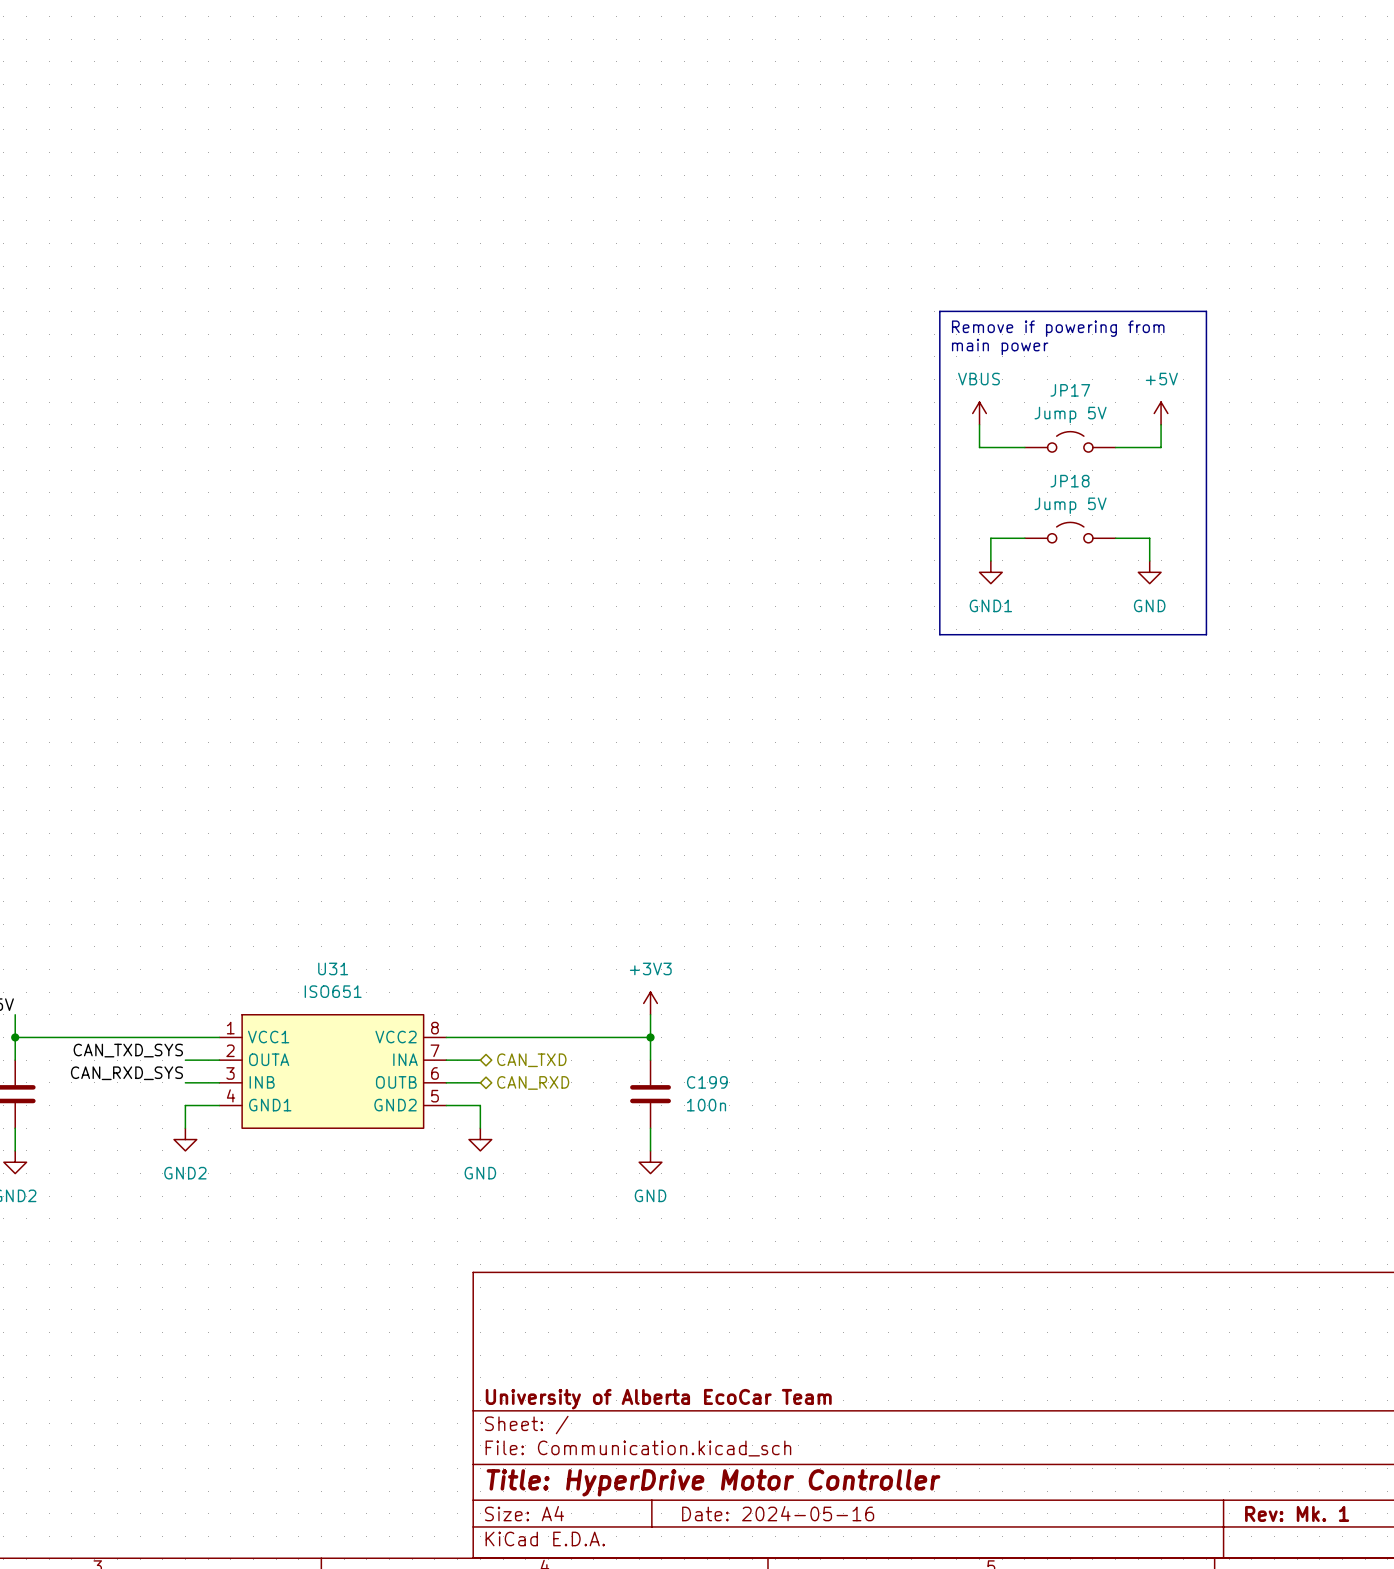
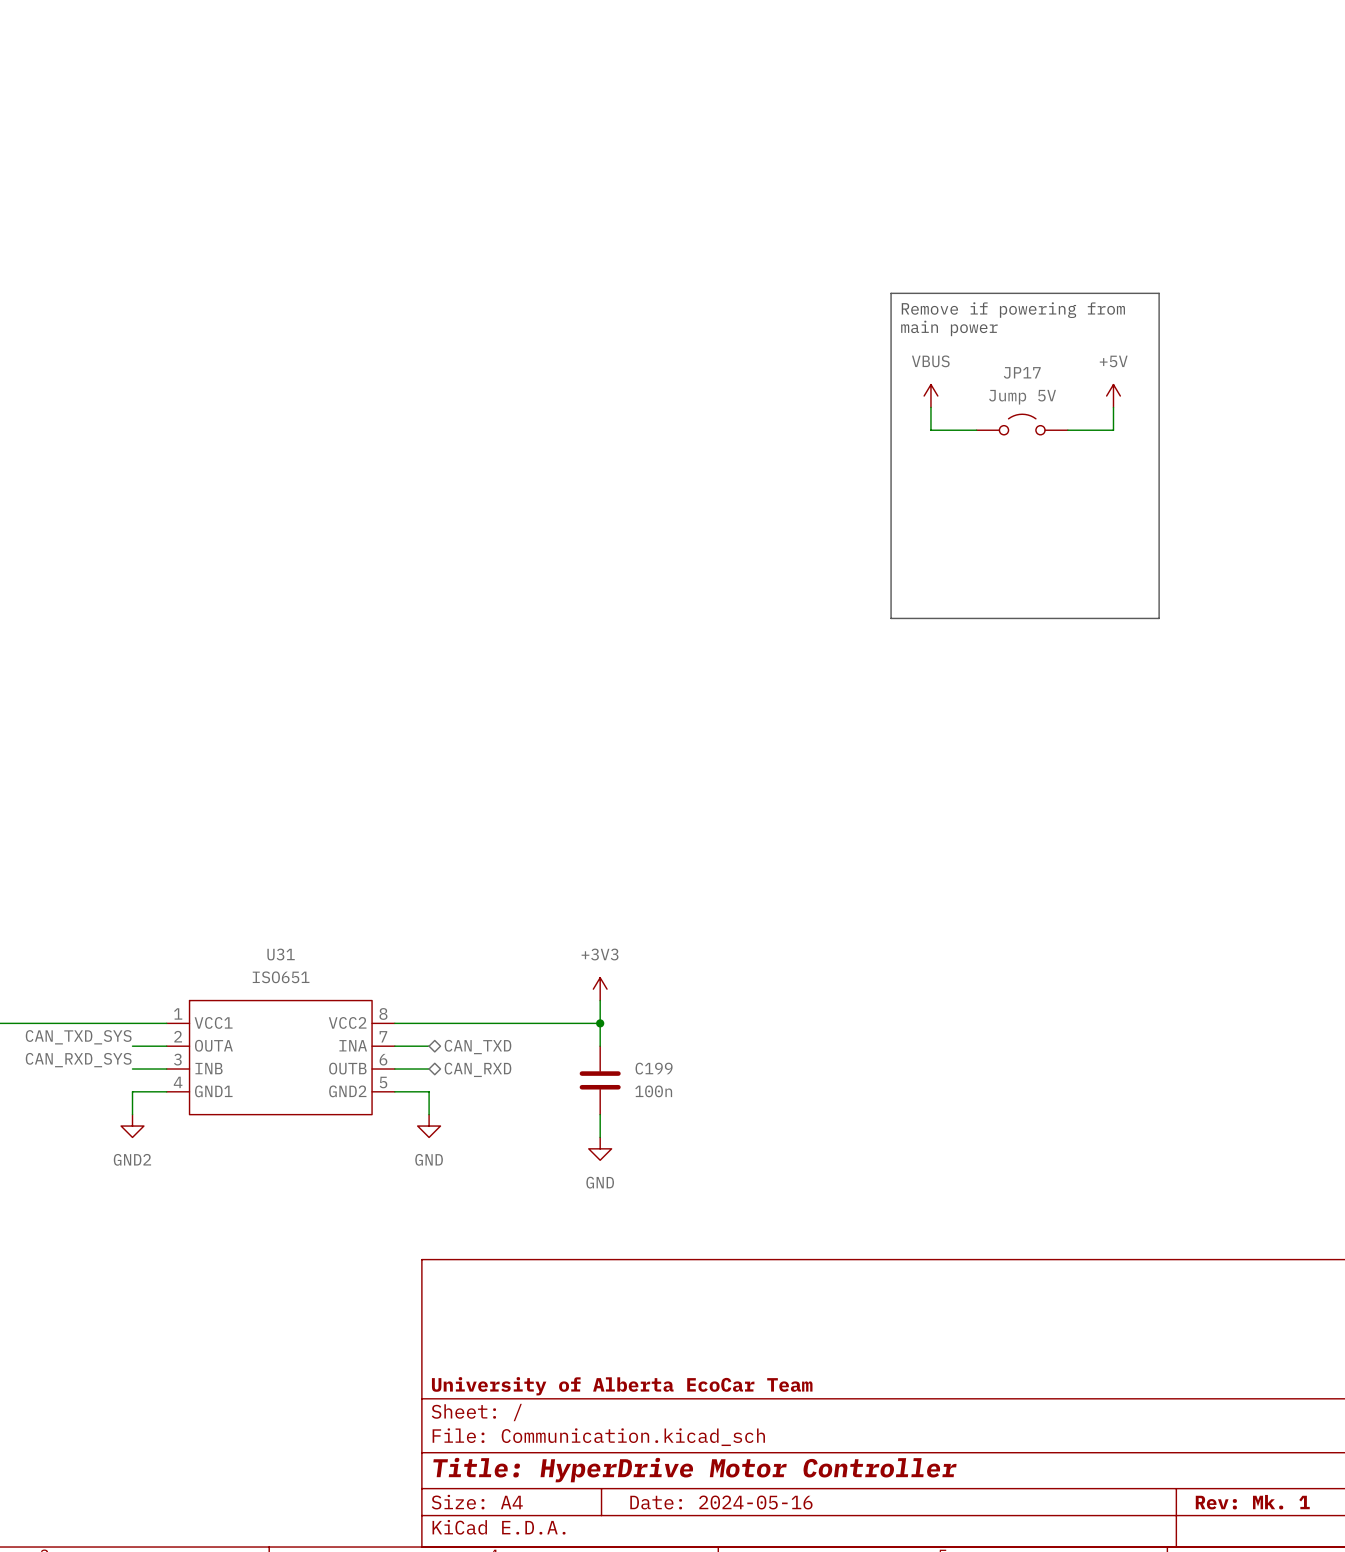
JP18: Jump 5V (1070, 532) -> none
wire: (1024, 538) (990, 538) (990, 560) -> none
wire: (1115, 538) (1149, 538) (1149, 560) -> none
power symbol: GND1 (990, 572) -> none
power symbol: GND (1149, 572) -> none

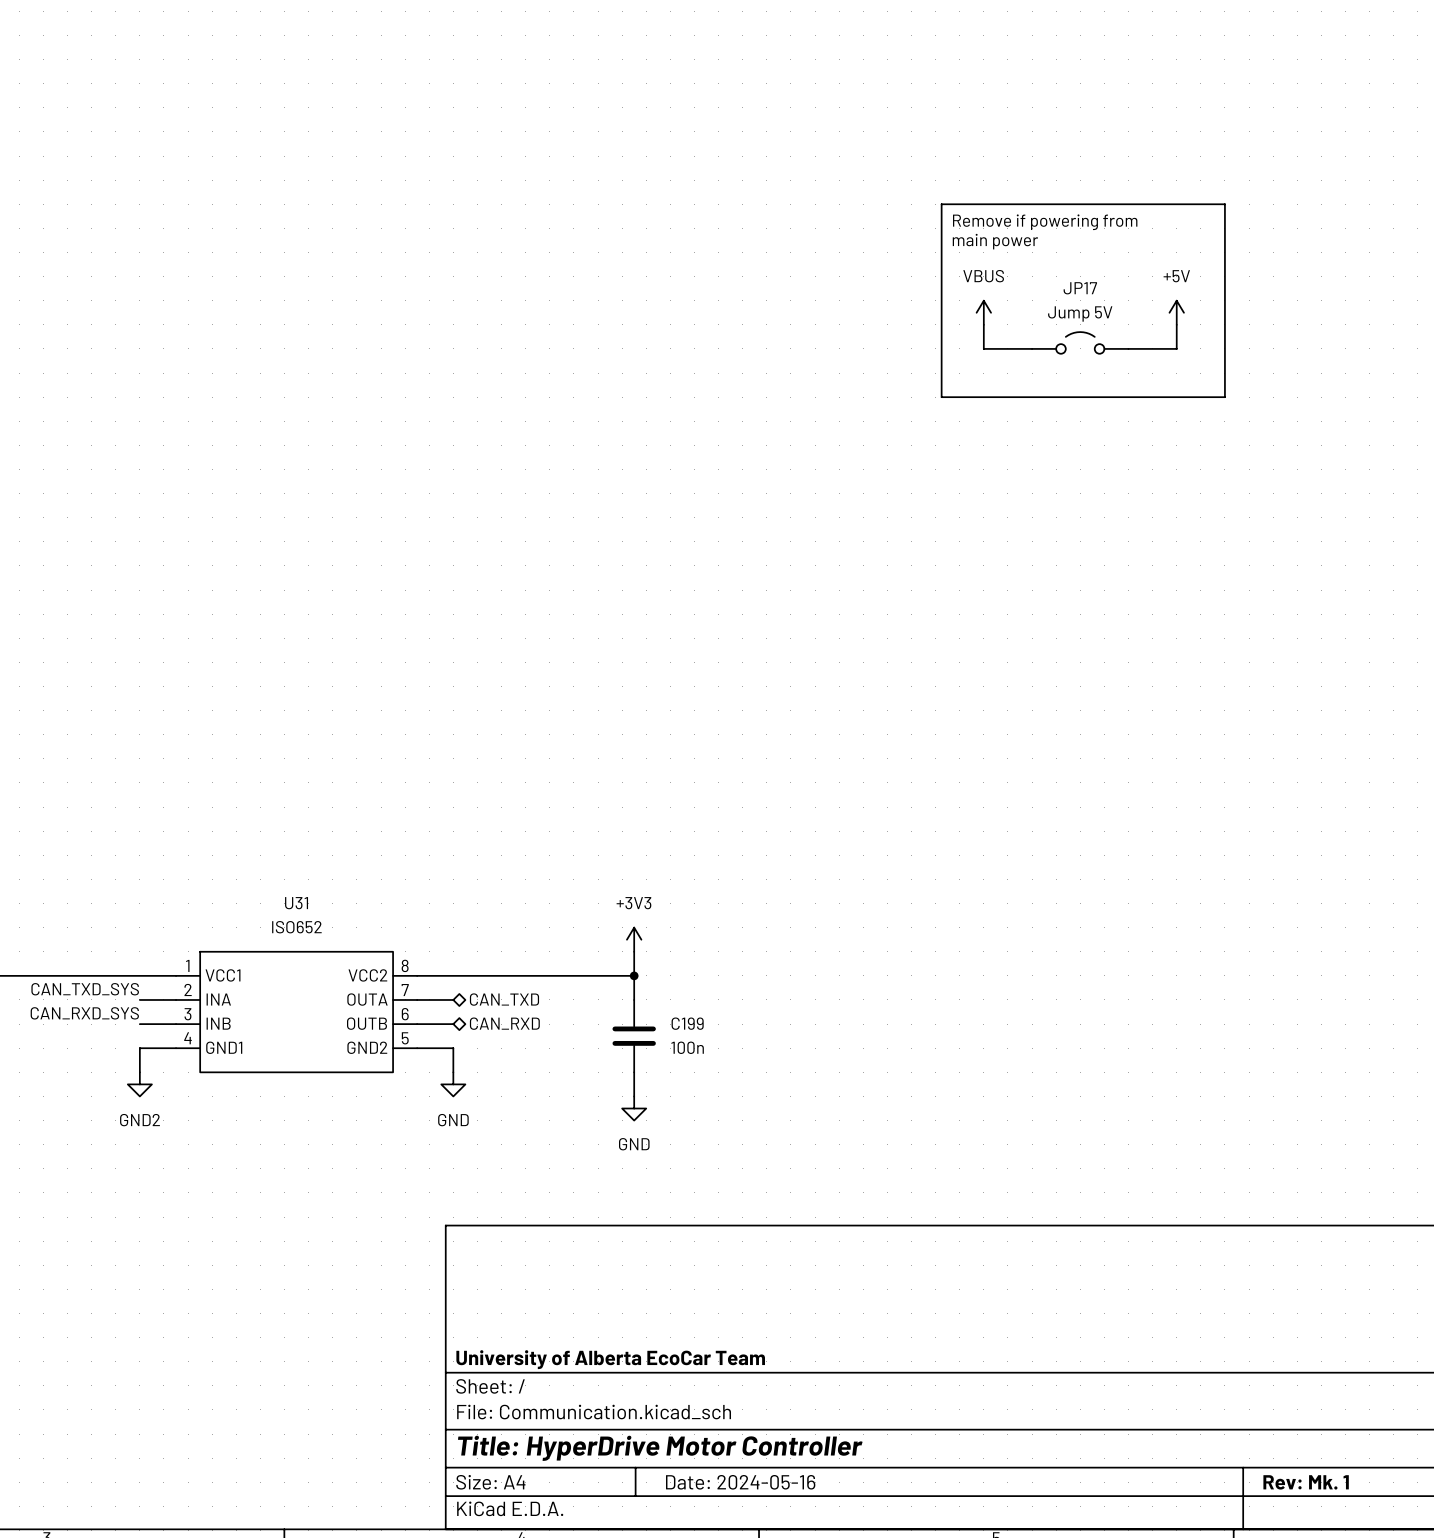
line: (891, 475) (891, 618) (1159, 618) (1159, 475) -> (941, 397) (1224, 397)
U31 value: ISO651 (281, 977) -> ISO652 (296, 927)
U31 pin name: OUTA (213, 1045) -> INA (218, 999)
U31 pin name: INA (353, 1045) -> OUTA (367, 999)

